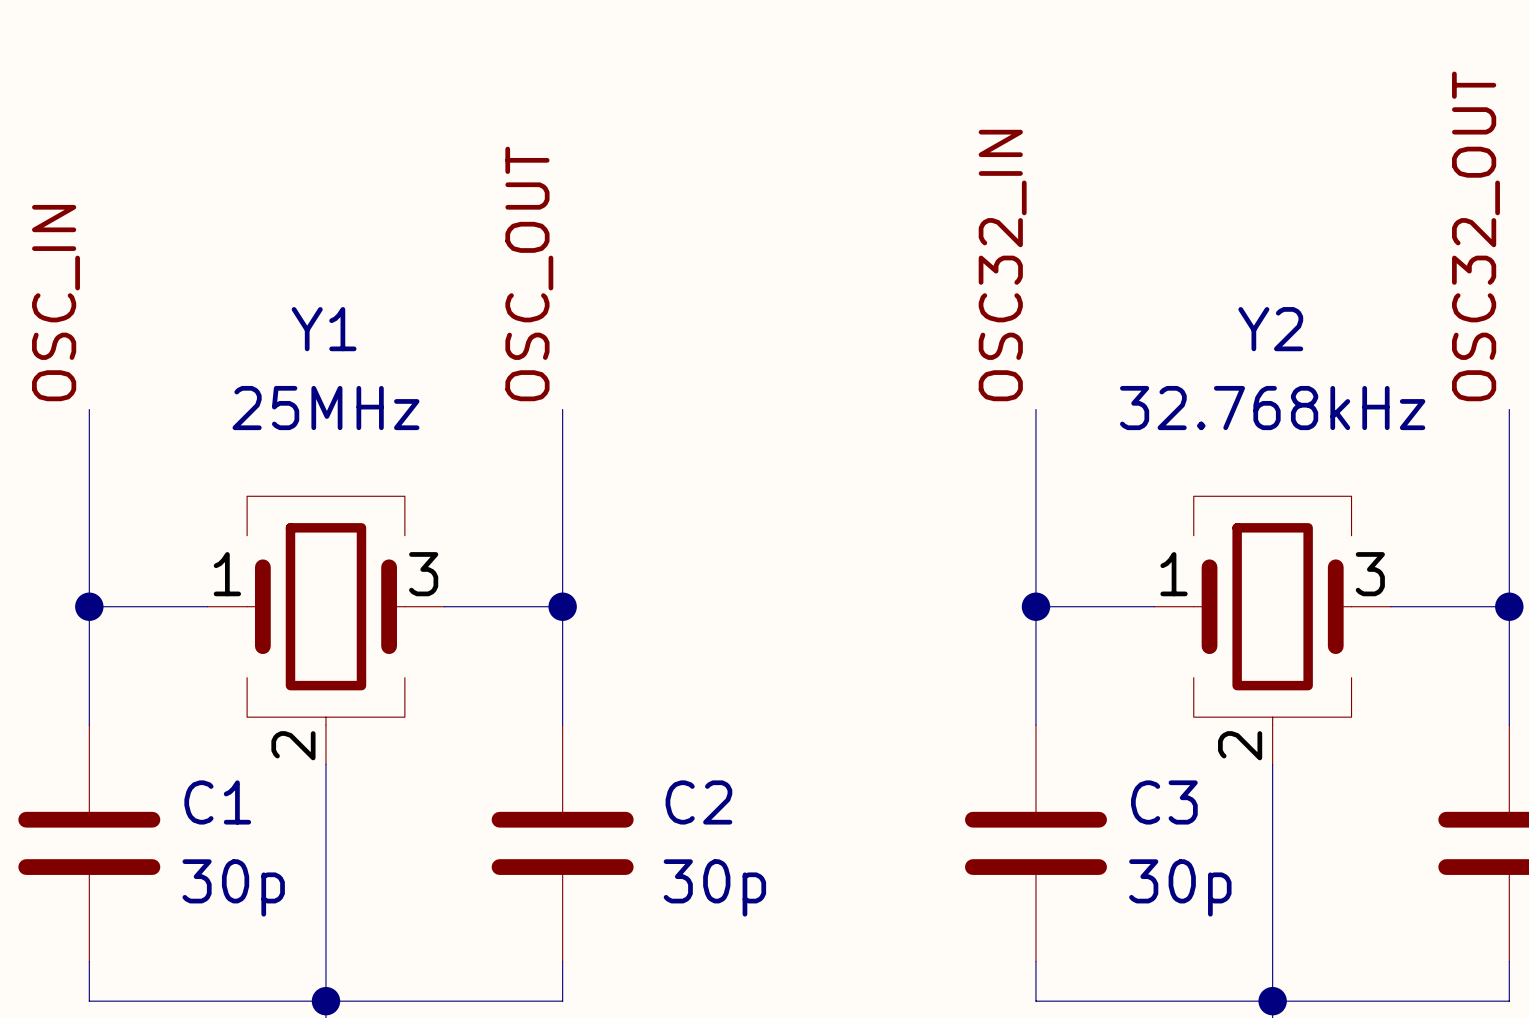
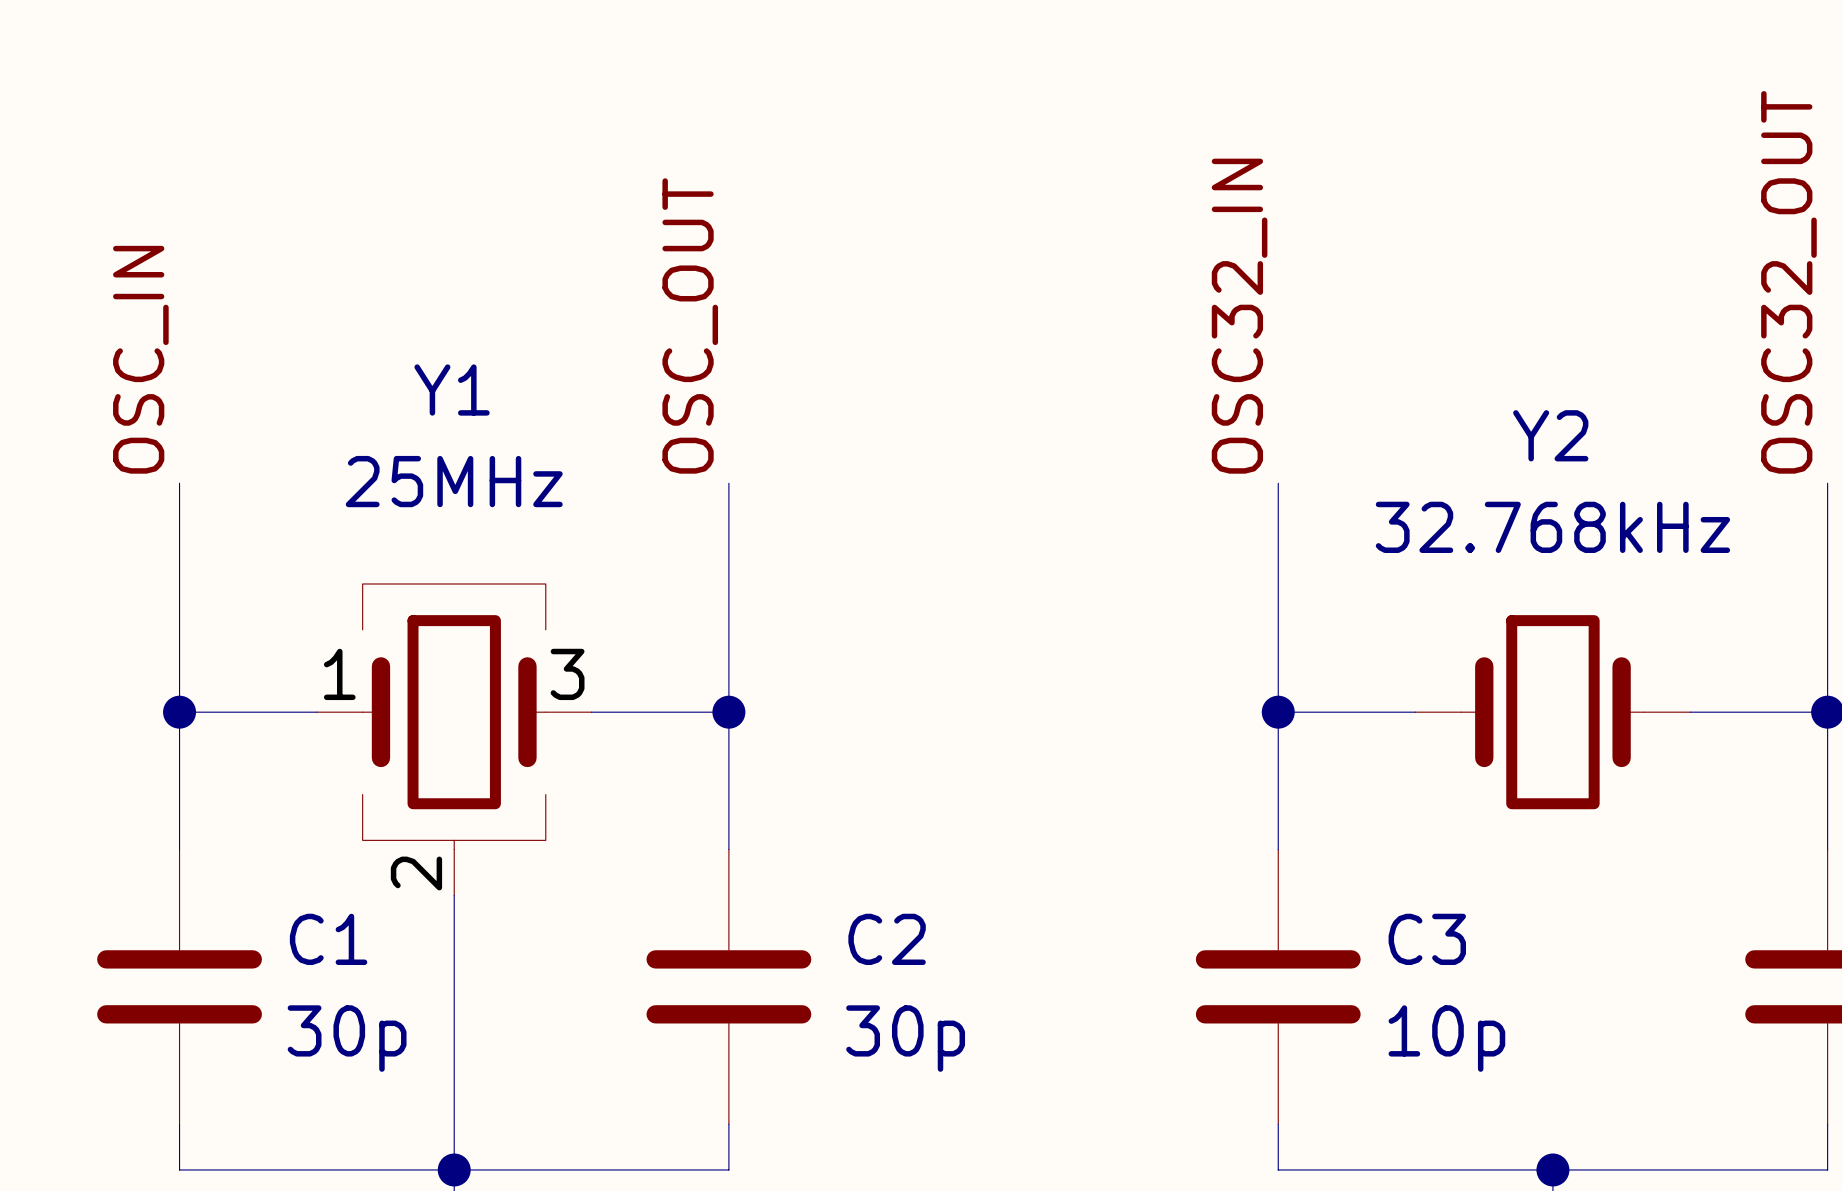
Y2 name position: Y2 (1270, 329) -> Y2 (1550, 435)
Y2 value position: 32.768kHz (1272, 408) -> 32.768kHz (1552, 527)
Y2 symbol: [1154, 496, 1391, 765] -> [1415, 615, 1691, 810]
wire: (1272, 764) (1272, 1001) -> none
C3 value: 30p (1180, 887) -> 10p (1446, 1038)

